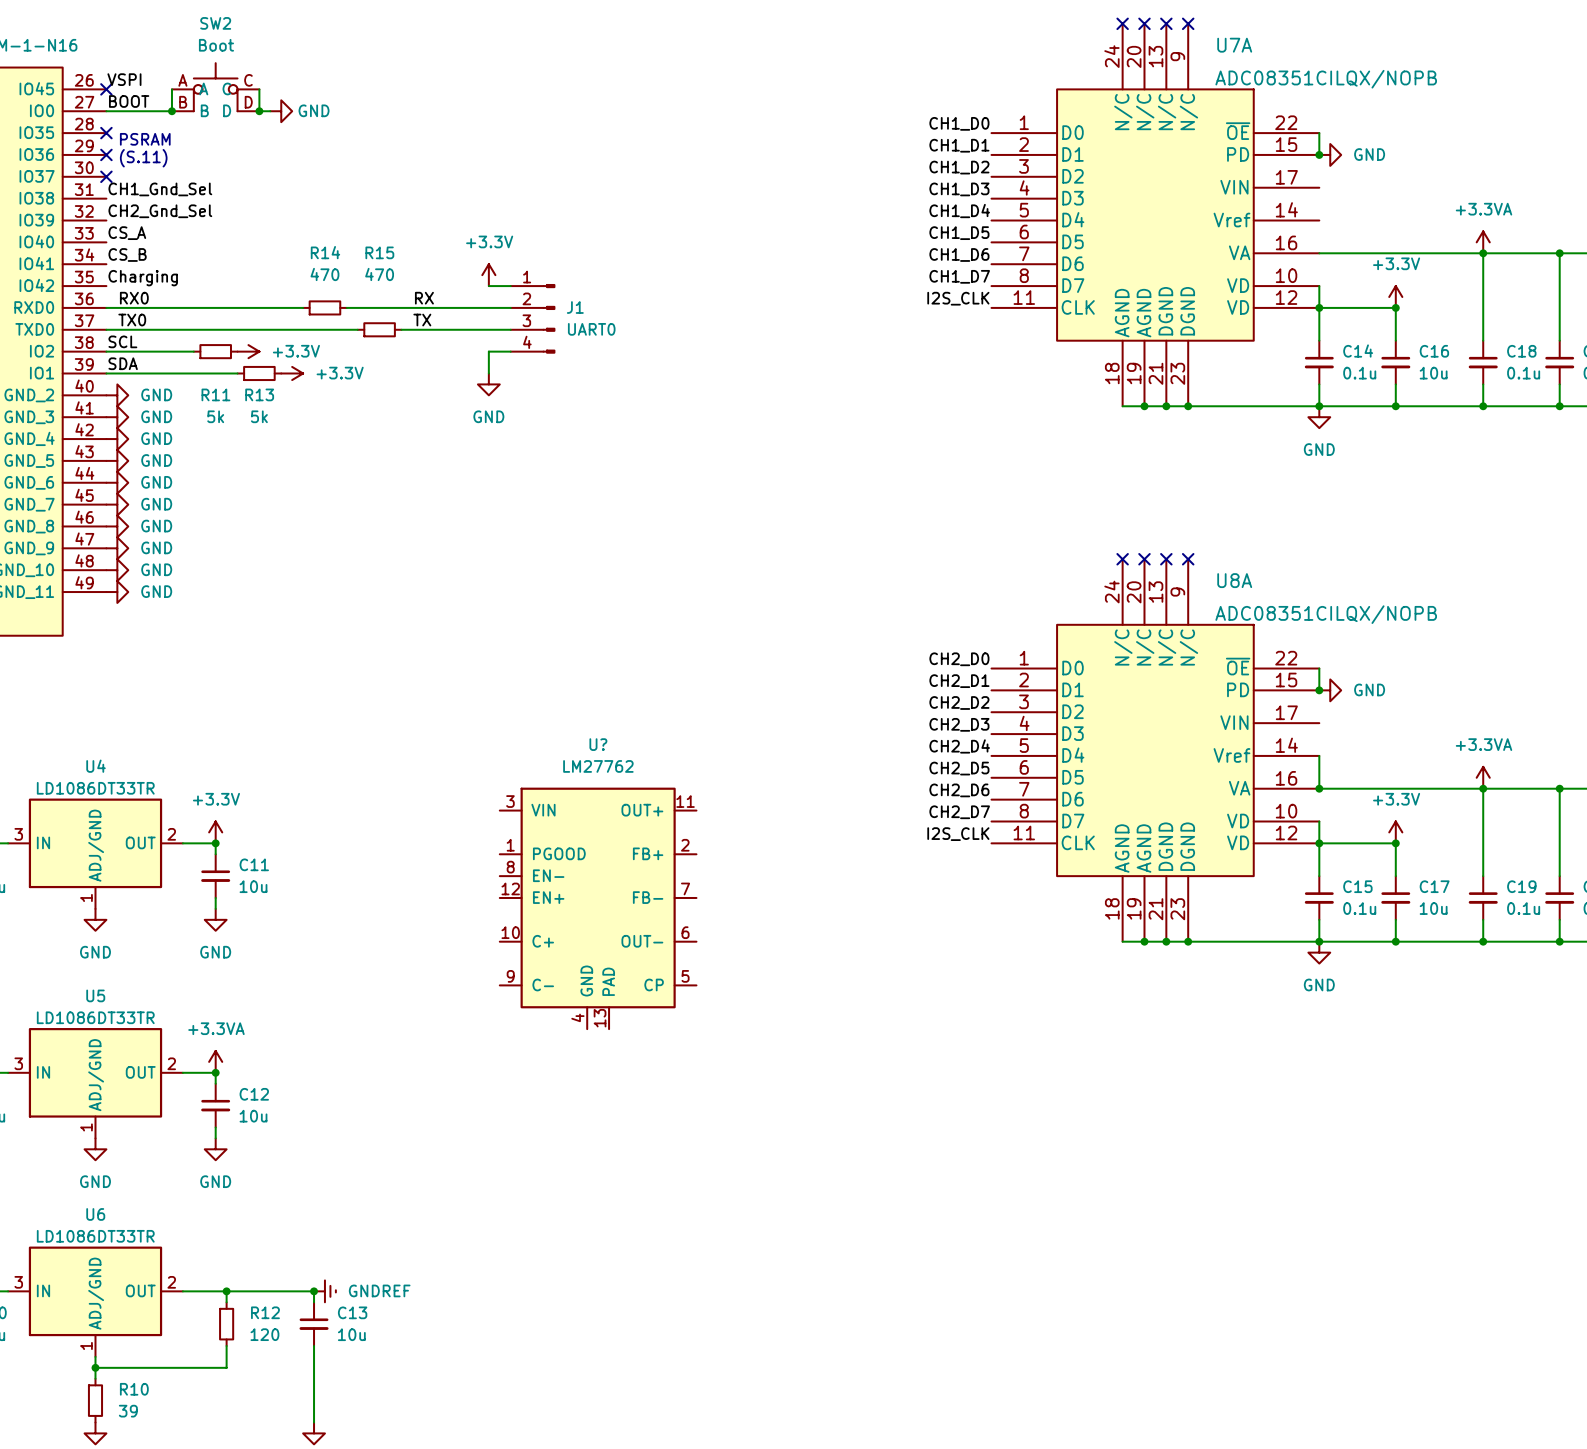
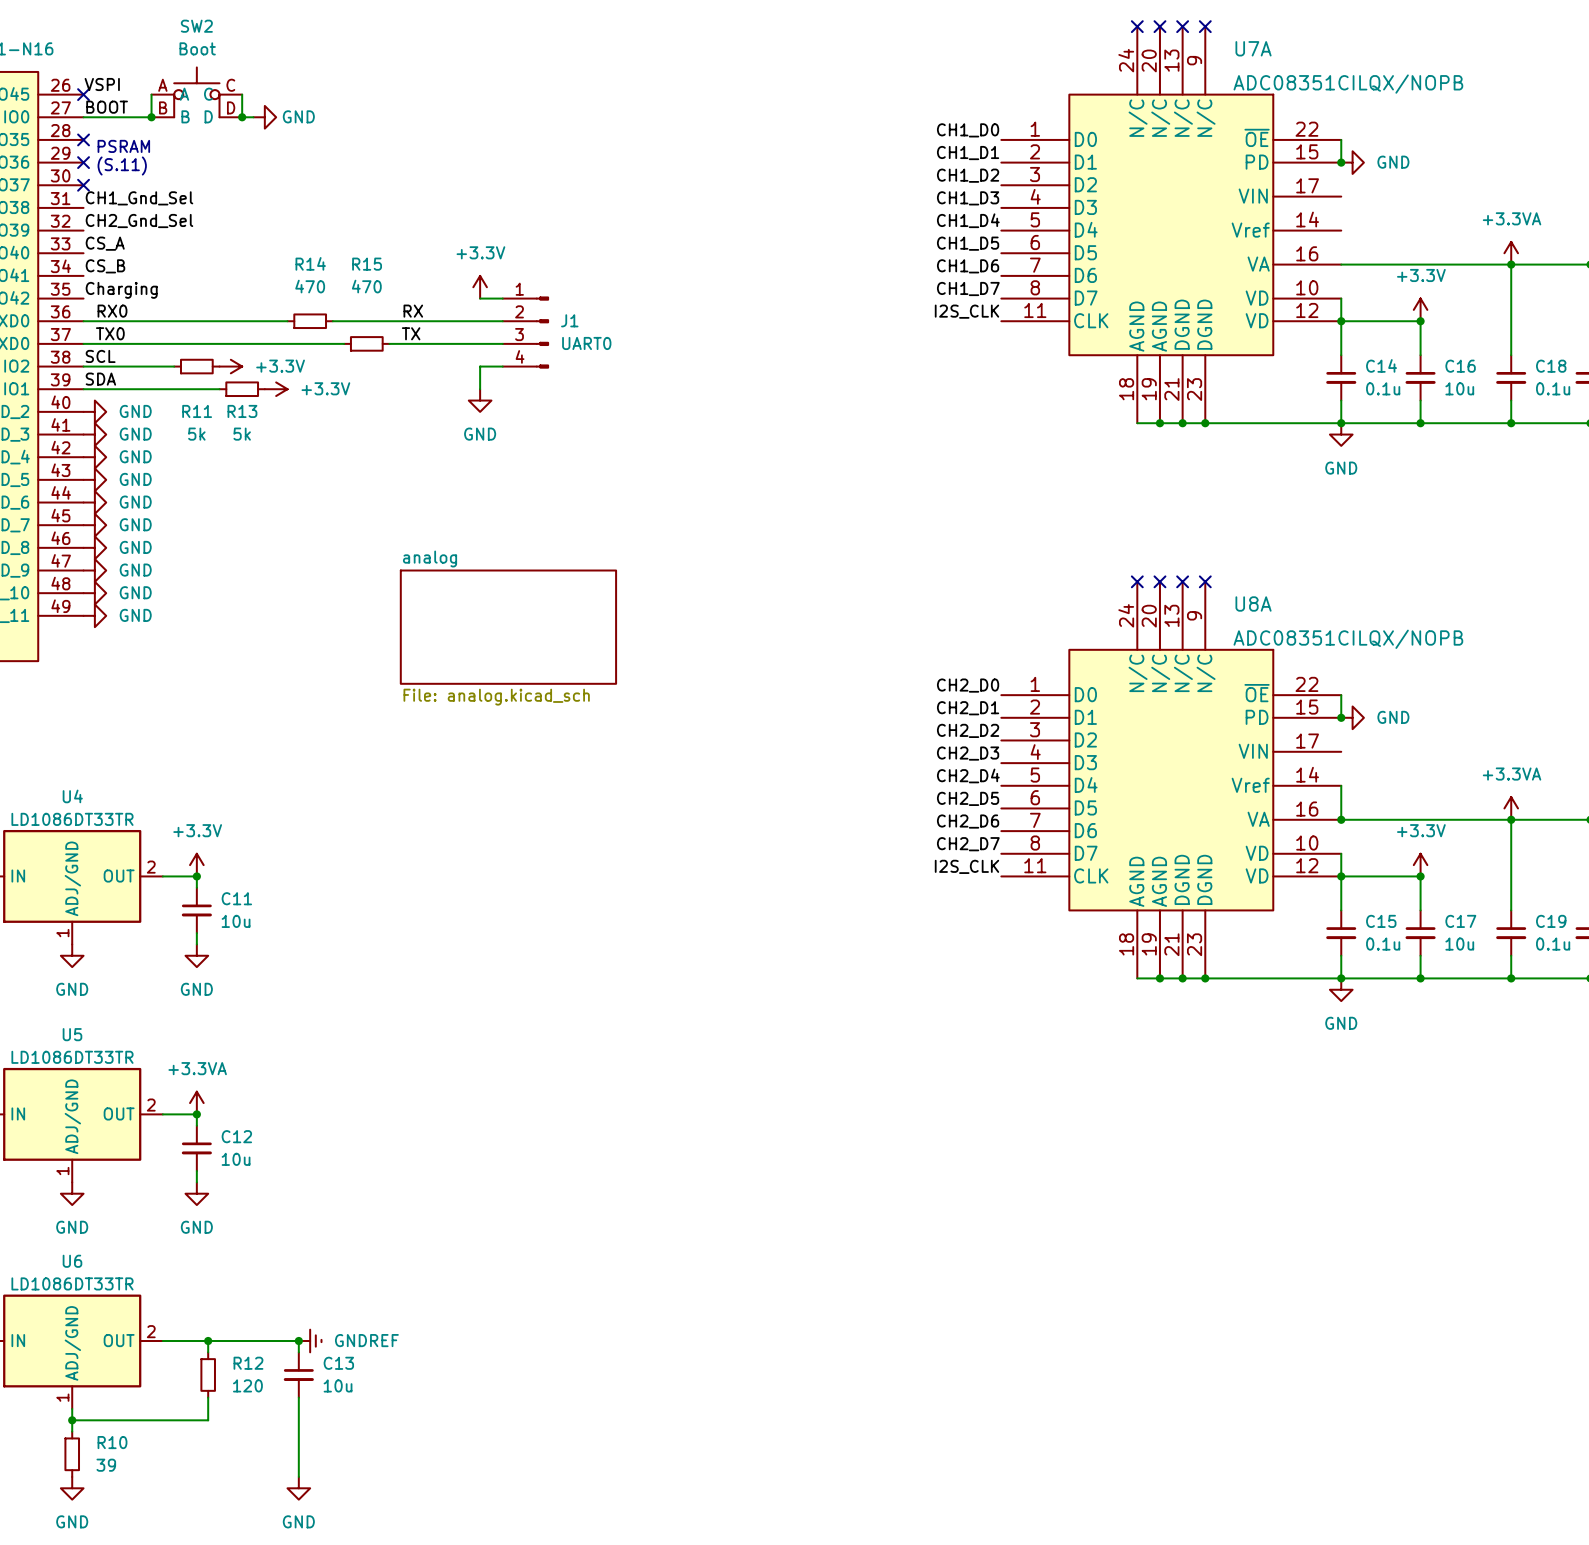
sheet analog: none -> File: analog.kicad_sch (508, 627)
U?: LM27762 (598, 908) -> none

